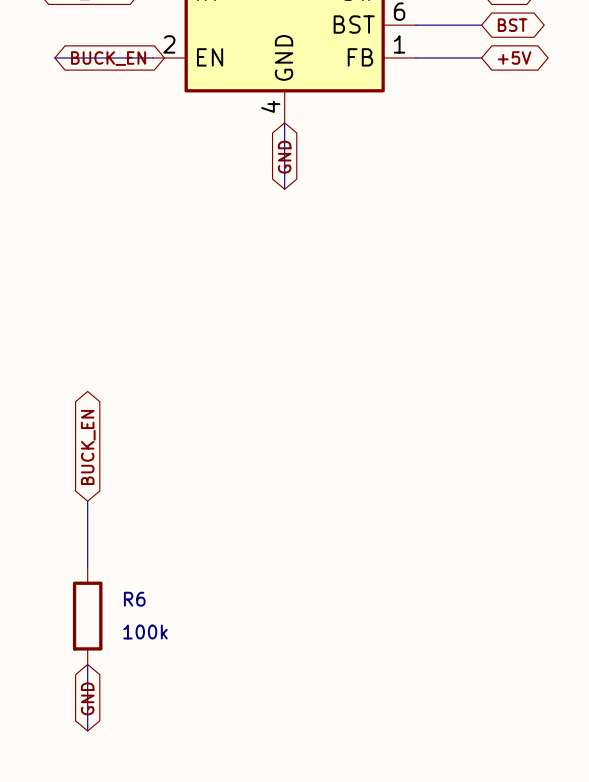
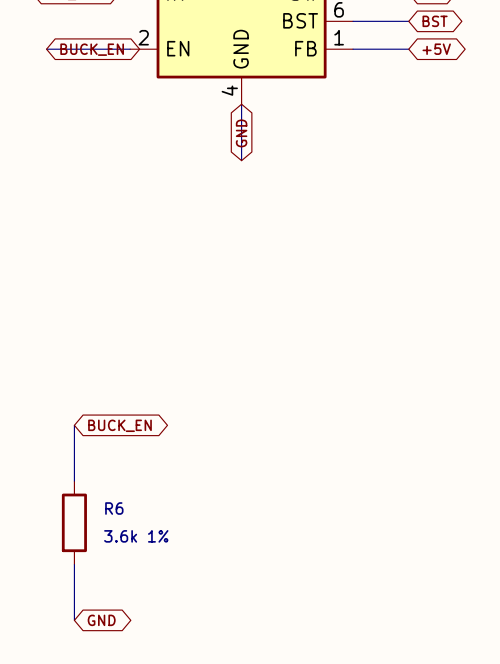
global label rotation: 0° (88, 447) -> 90° clockwise (120, 425)
R6 value: 100k (145, 632) -> 3.6k 1% (136, 536)
global label rotation: 0° (87, 698) -> 90° clockwise (101, 620)

